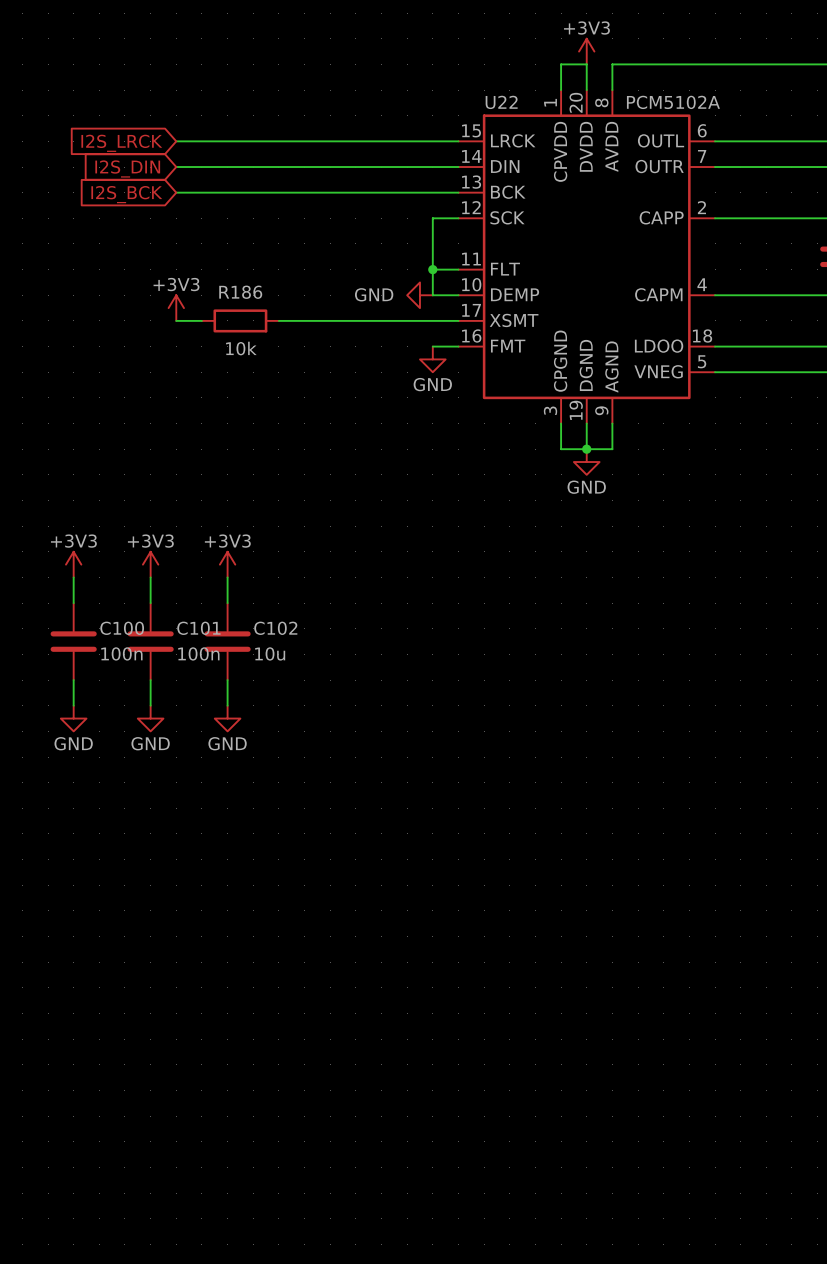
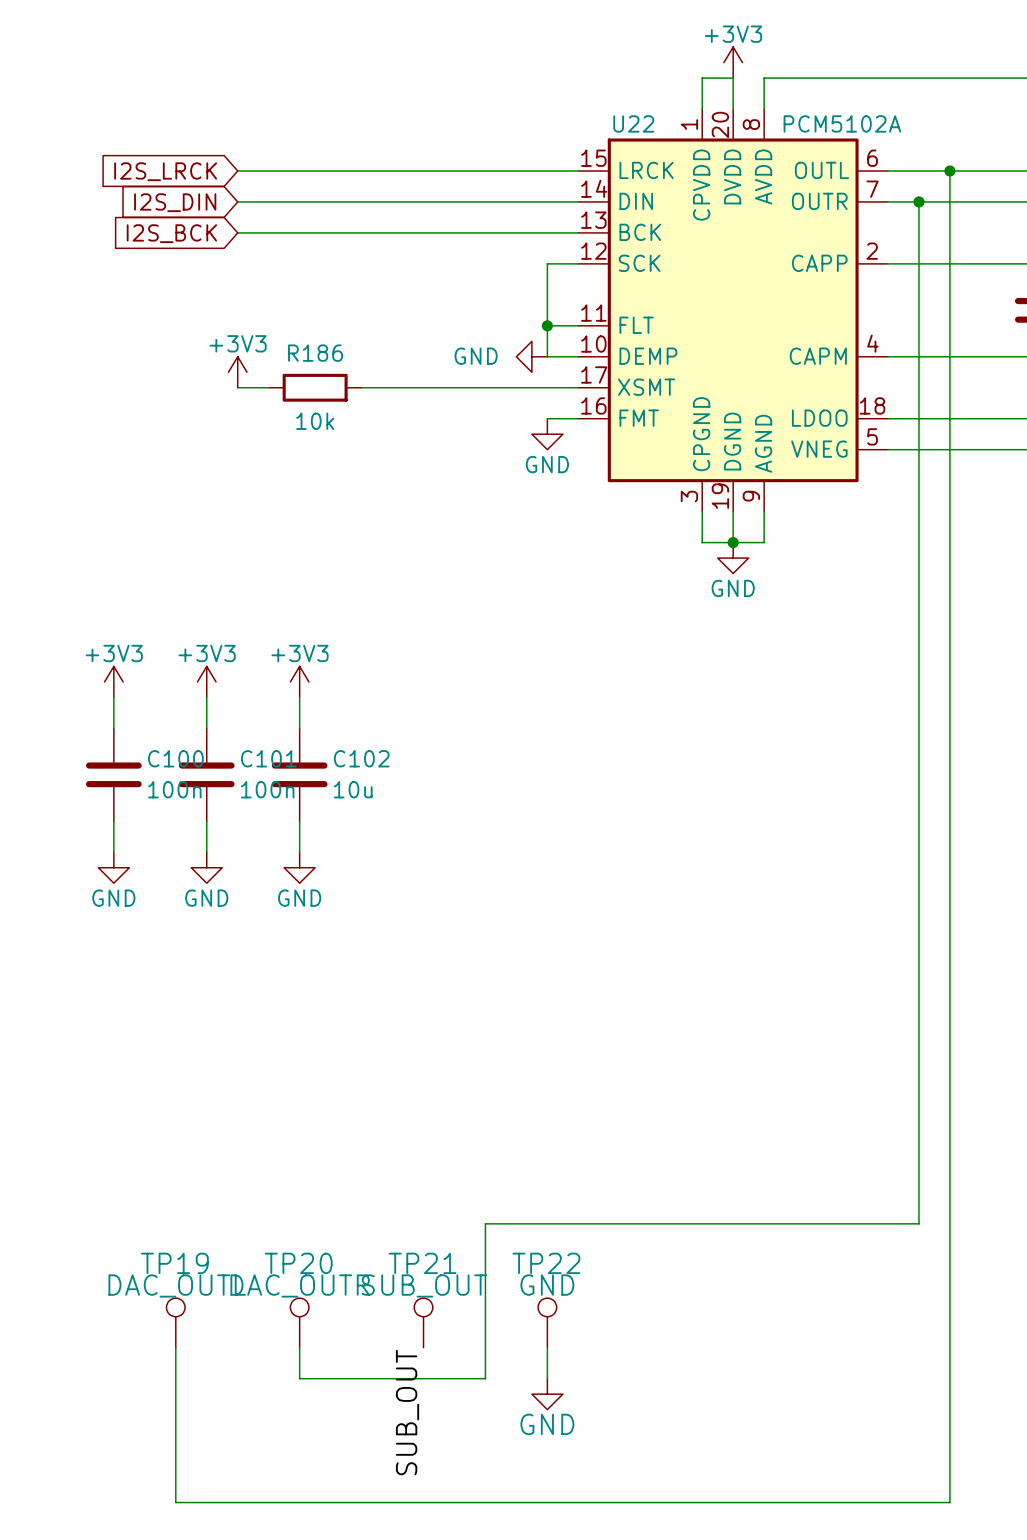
wire: none -> (949, 170) (949, 1502) (175, 1502) (175, 1347)
junction: none -> (949, 170)
wire: none -> (918, 201) (918, 1223) (485, 1223) (485, 1378) (299, 1378) (299, 1347)
junction: none -> (918, 201)
TP19: none -> DAC_OUTL (175, 1322)
TP20: none -> DAC_OUTR (299, 1322)
TP21: none -> SUB_OUT (423, 1322)
TP22: none -> GND (547, 1322)
wire: none -> (547, 1347) (547, 1378)
power symbol: none -> GND (547, 1394)
label: none -> SUB_OUT (407, 1412)

